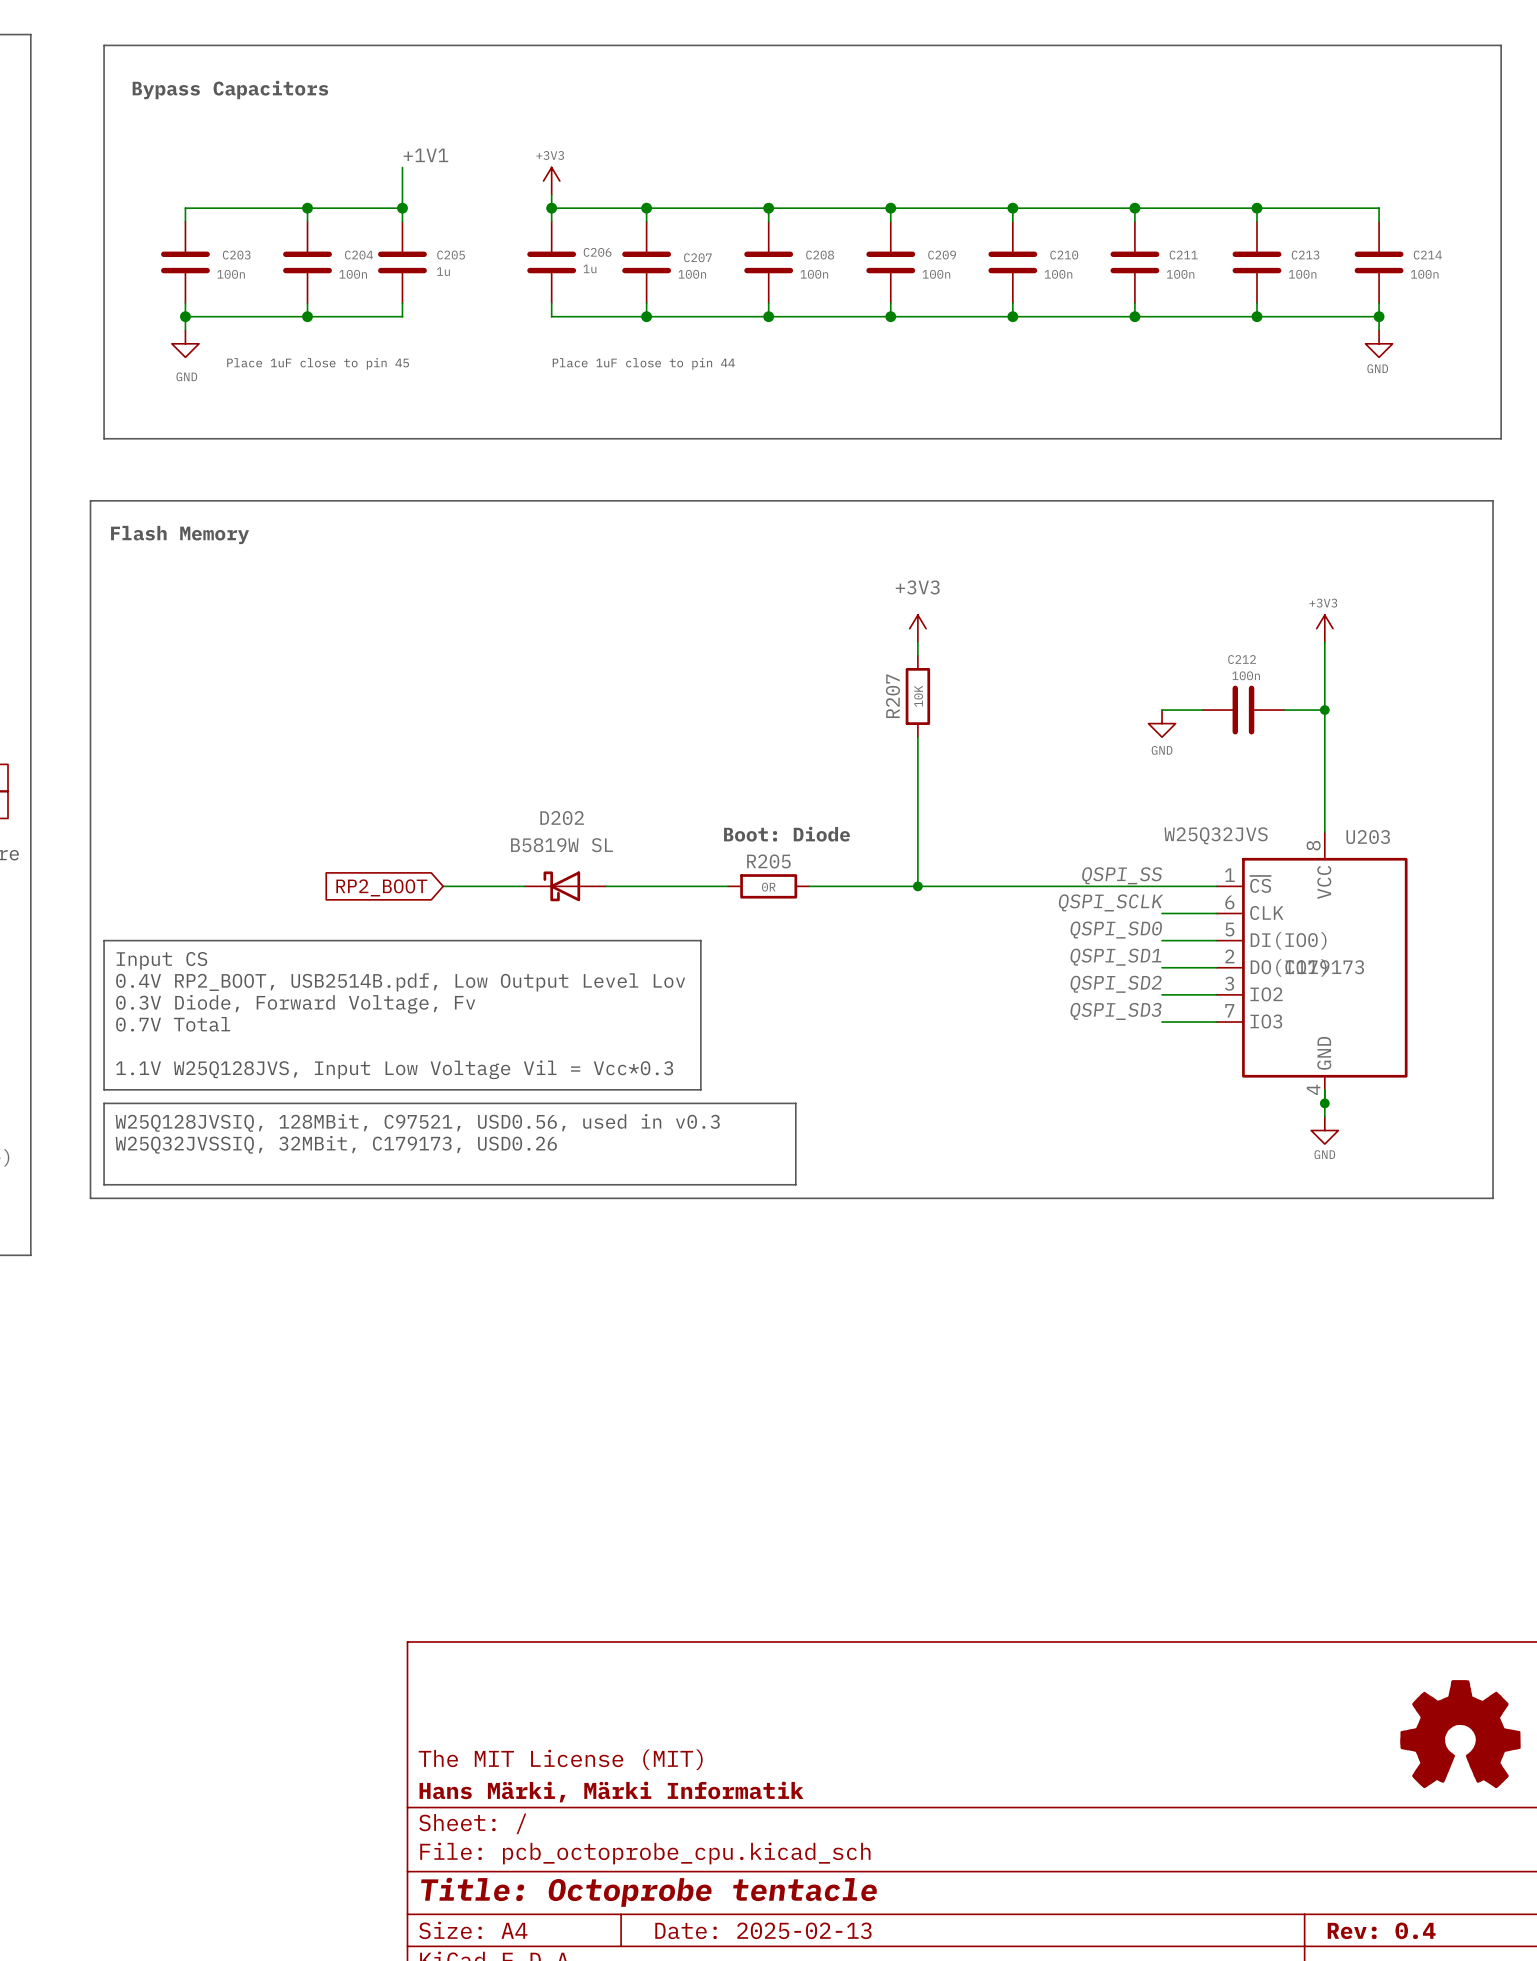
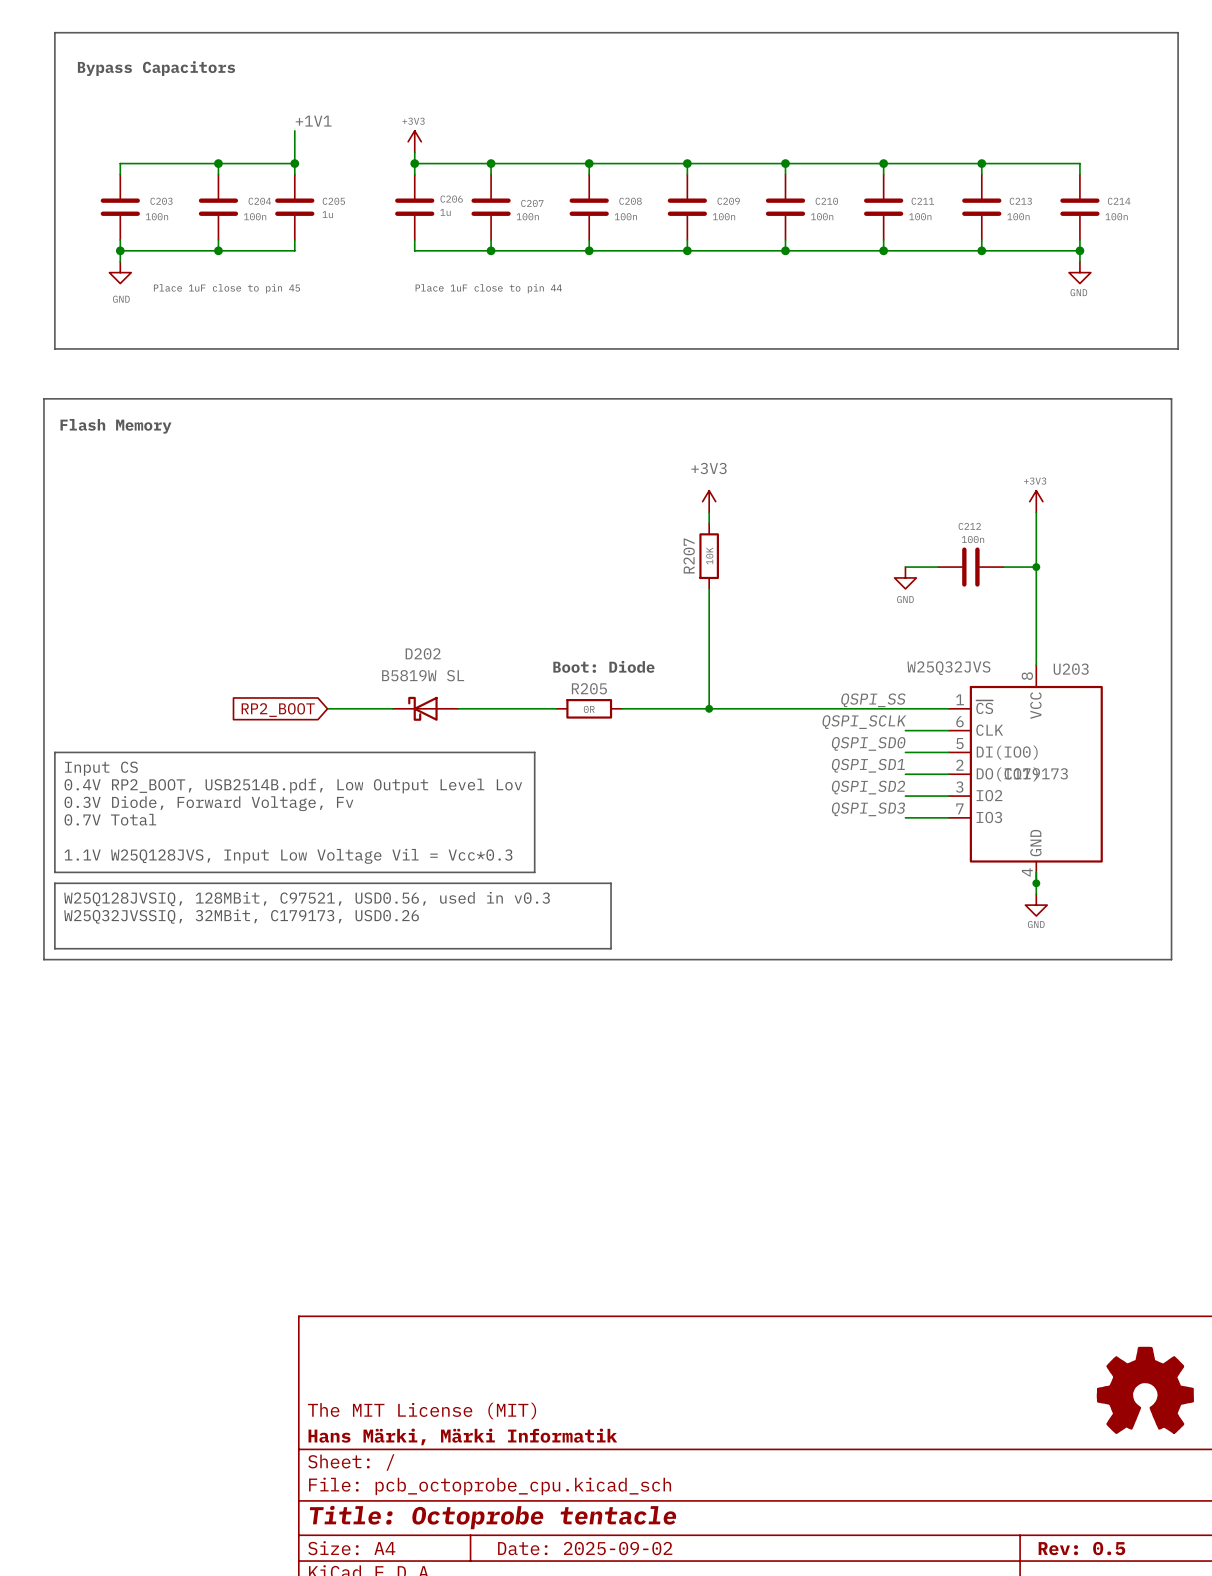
title block: Date: 2025-02-13 (763, 1930) -> Date: 2025-09-02 (585, 1548)
title block: Rev: 0.4 (1381, 1930) -> Rev: 0.5 (1081, 1548)

